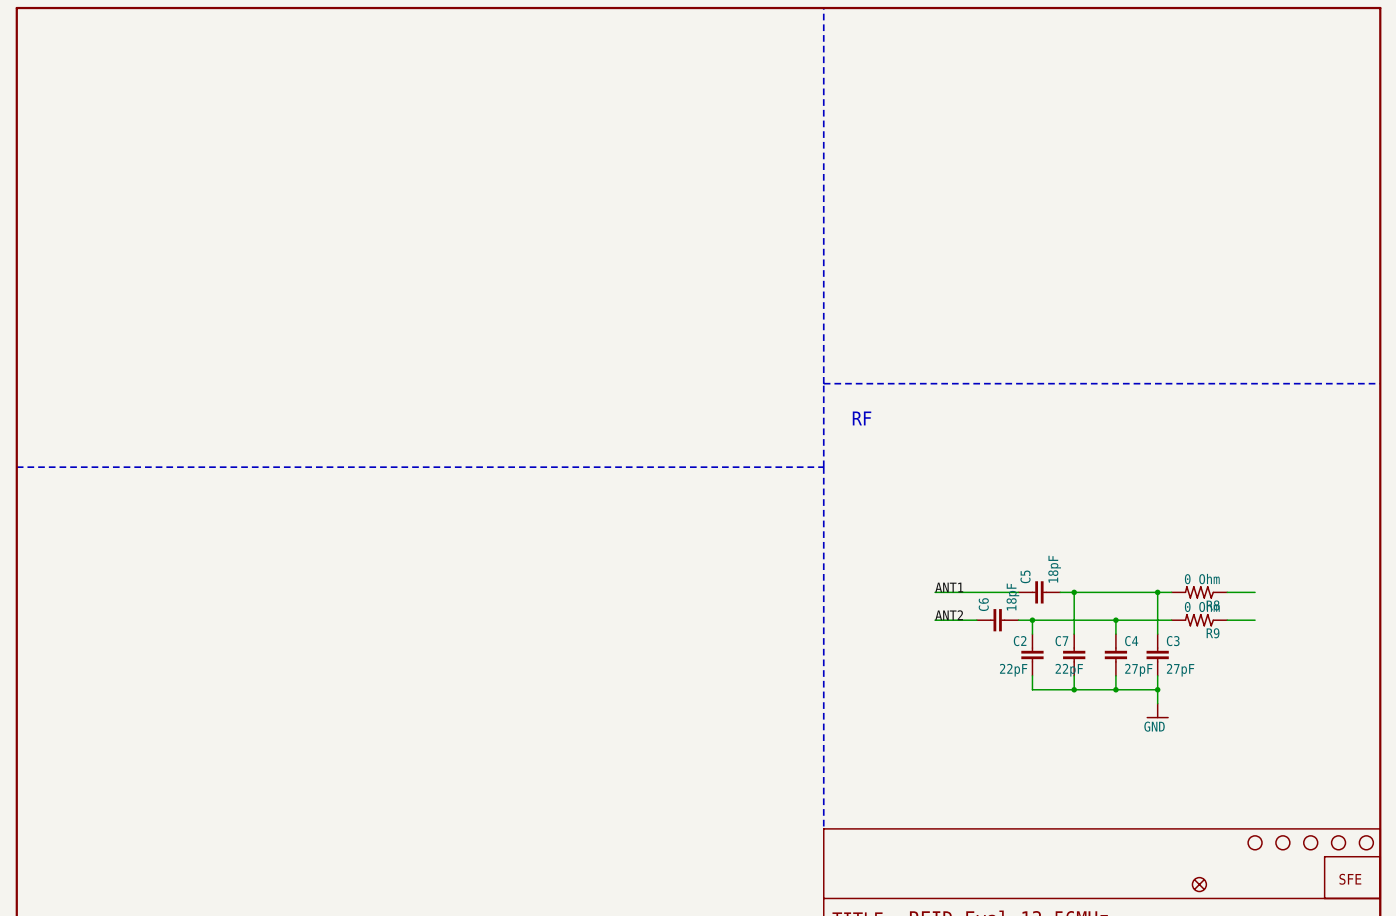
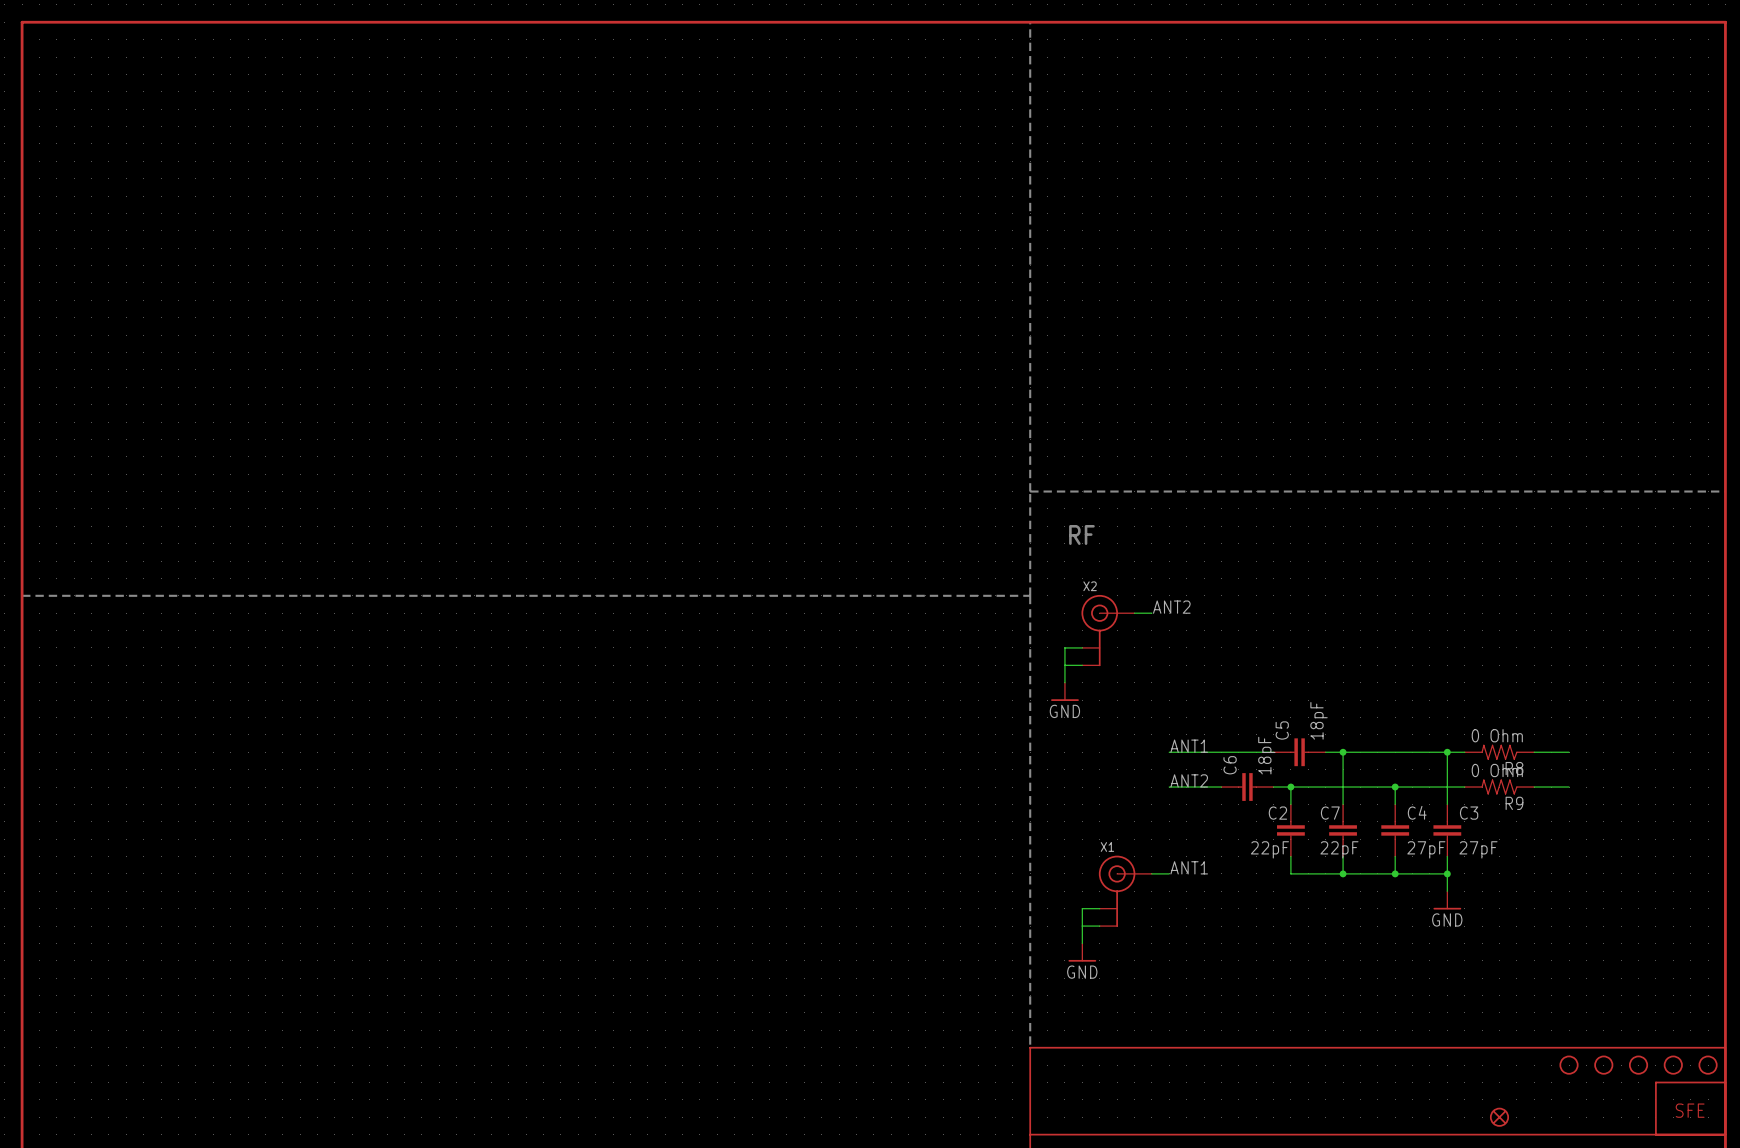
label: none -> ANT2 (1171, 607)
wire: none -> (1134, 613) (1151, 613)
X2: none -> (1107, 630)
wire: none -> (1082, 647) (1064, 647) (1064, 682)
wire: none -> (1064, 665) (1082, 665)
power symbol: none -> GND (1064, 691)
label: none -> ANT1 (1189, 867)
wire: none -> (1151, 873) (1169, 873)
X1: none -> (1125, 891)
wire: none -> (1099, 908) (1082, 908) (1082, 943)
wire: none -> (1082, 926) (1099, 926)
power symbol: none -> GND (1082, 952)

